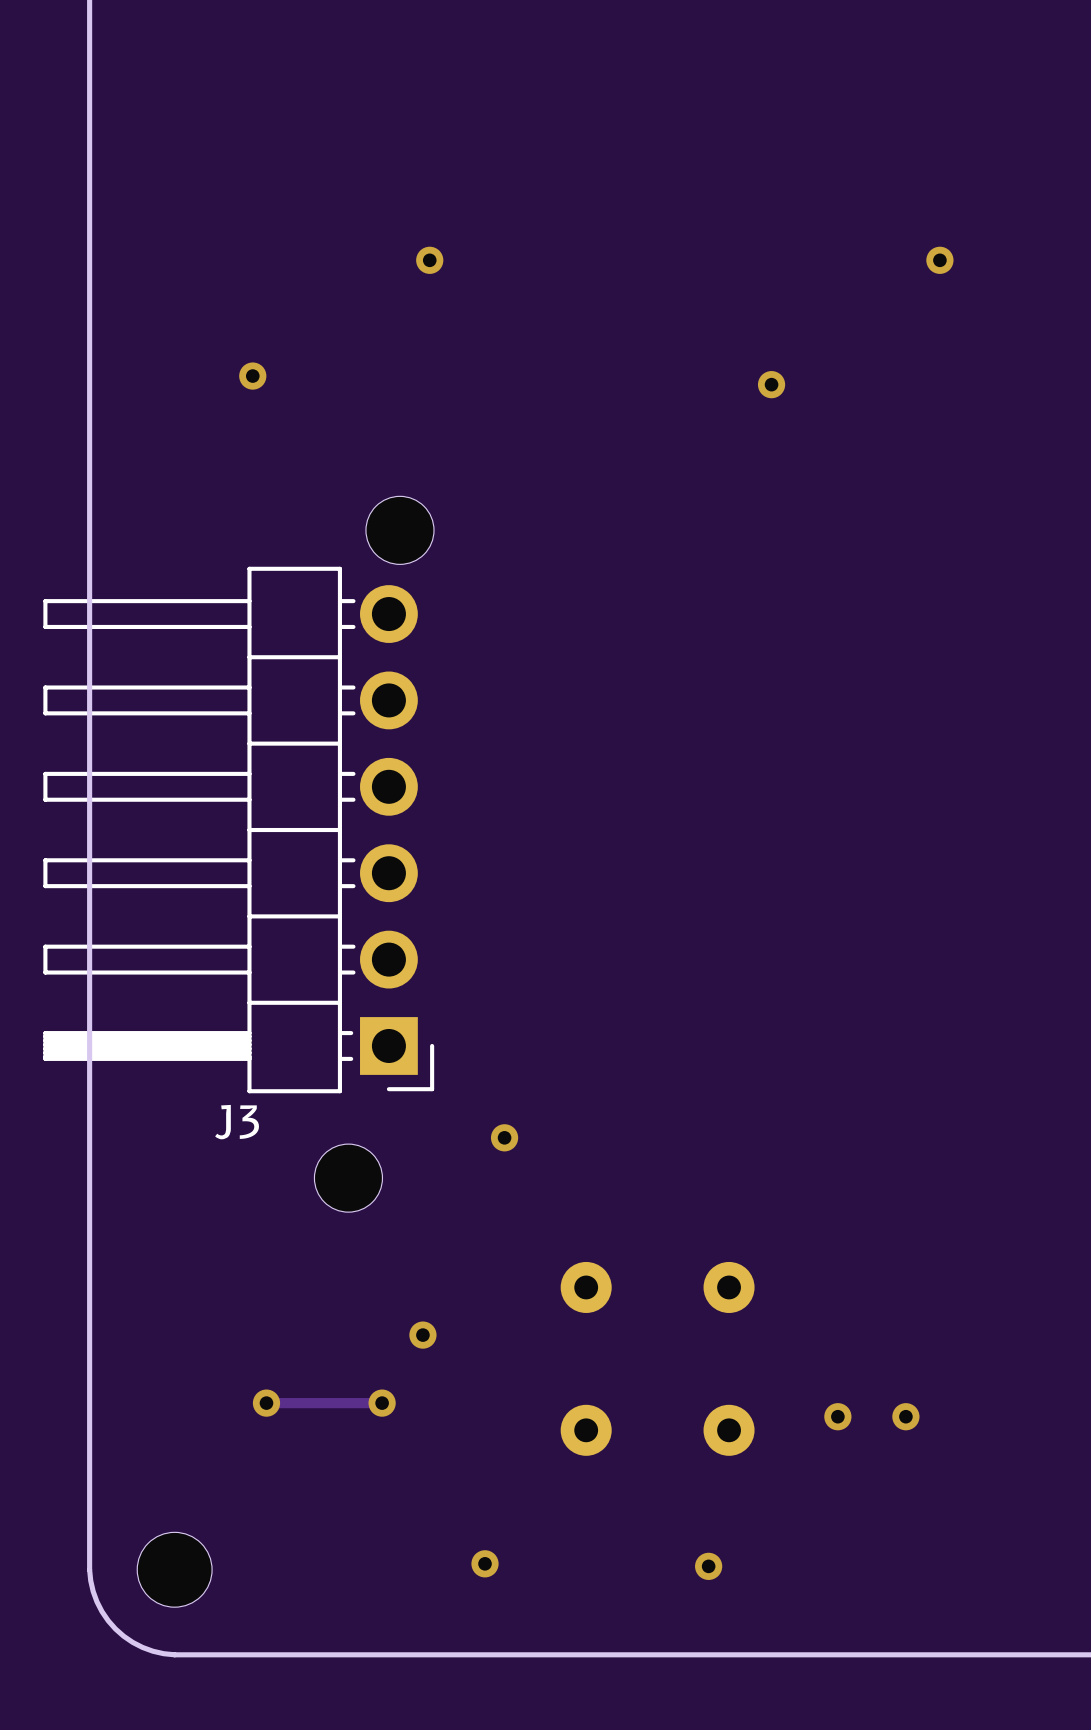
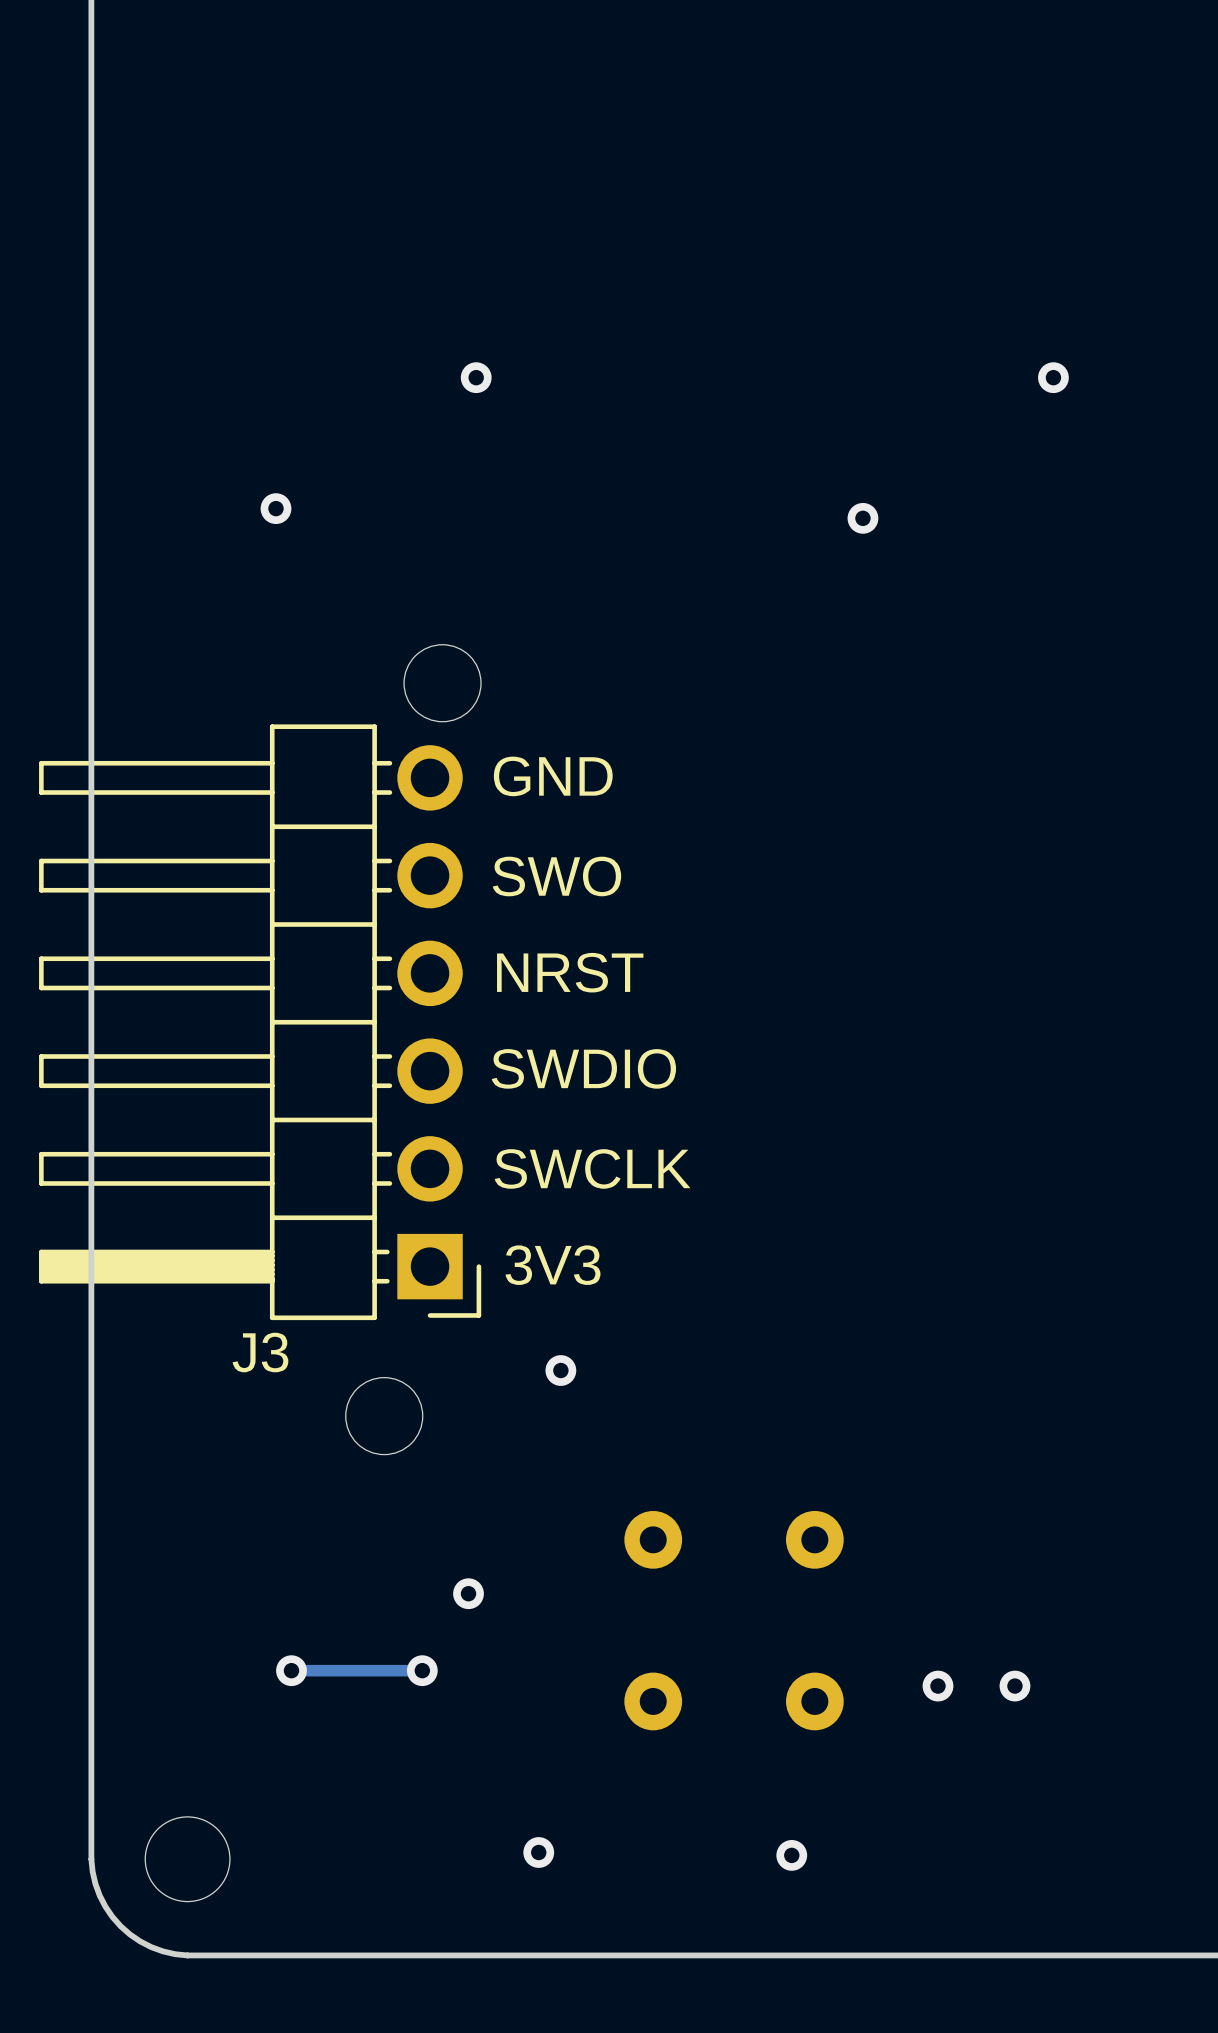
text: none -> GND (553, 776)
text: none -> SWO (556, 876)
text: none -> NRST (570, 972)
text: none -> SWDIO (583, 1068)
text: none -> SWCLK (592, 1168)
text: none -> 3V3 (553, 1265)

